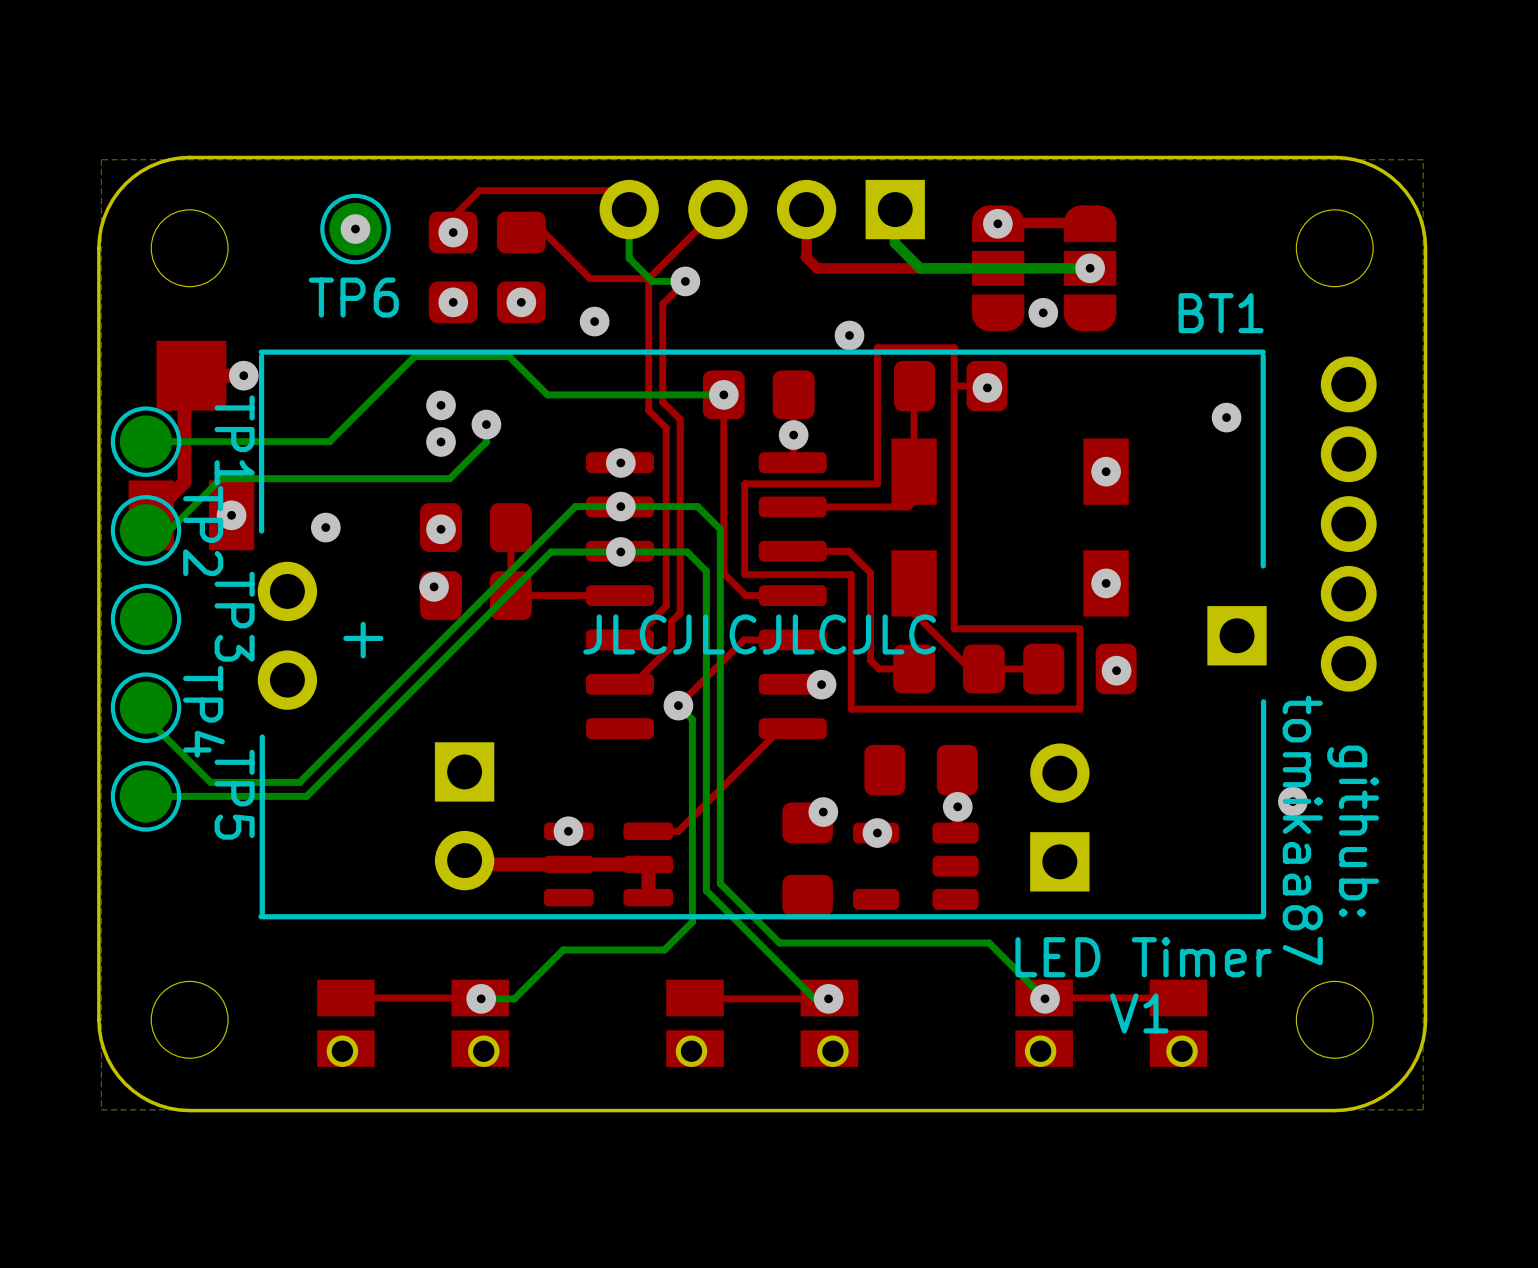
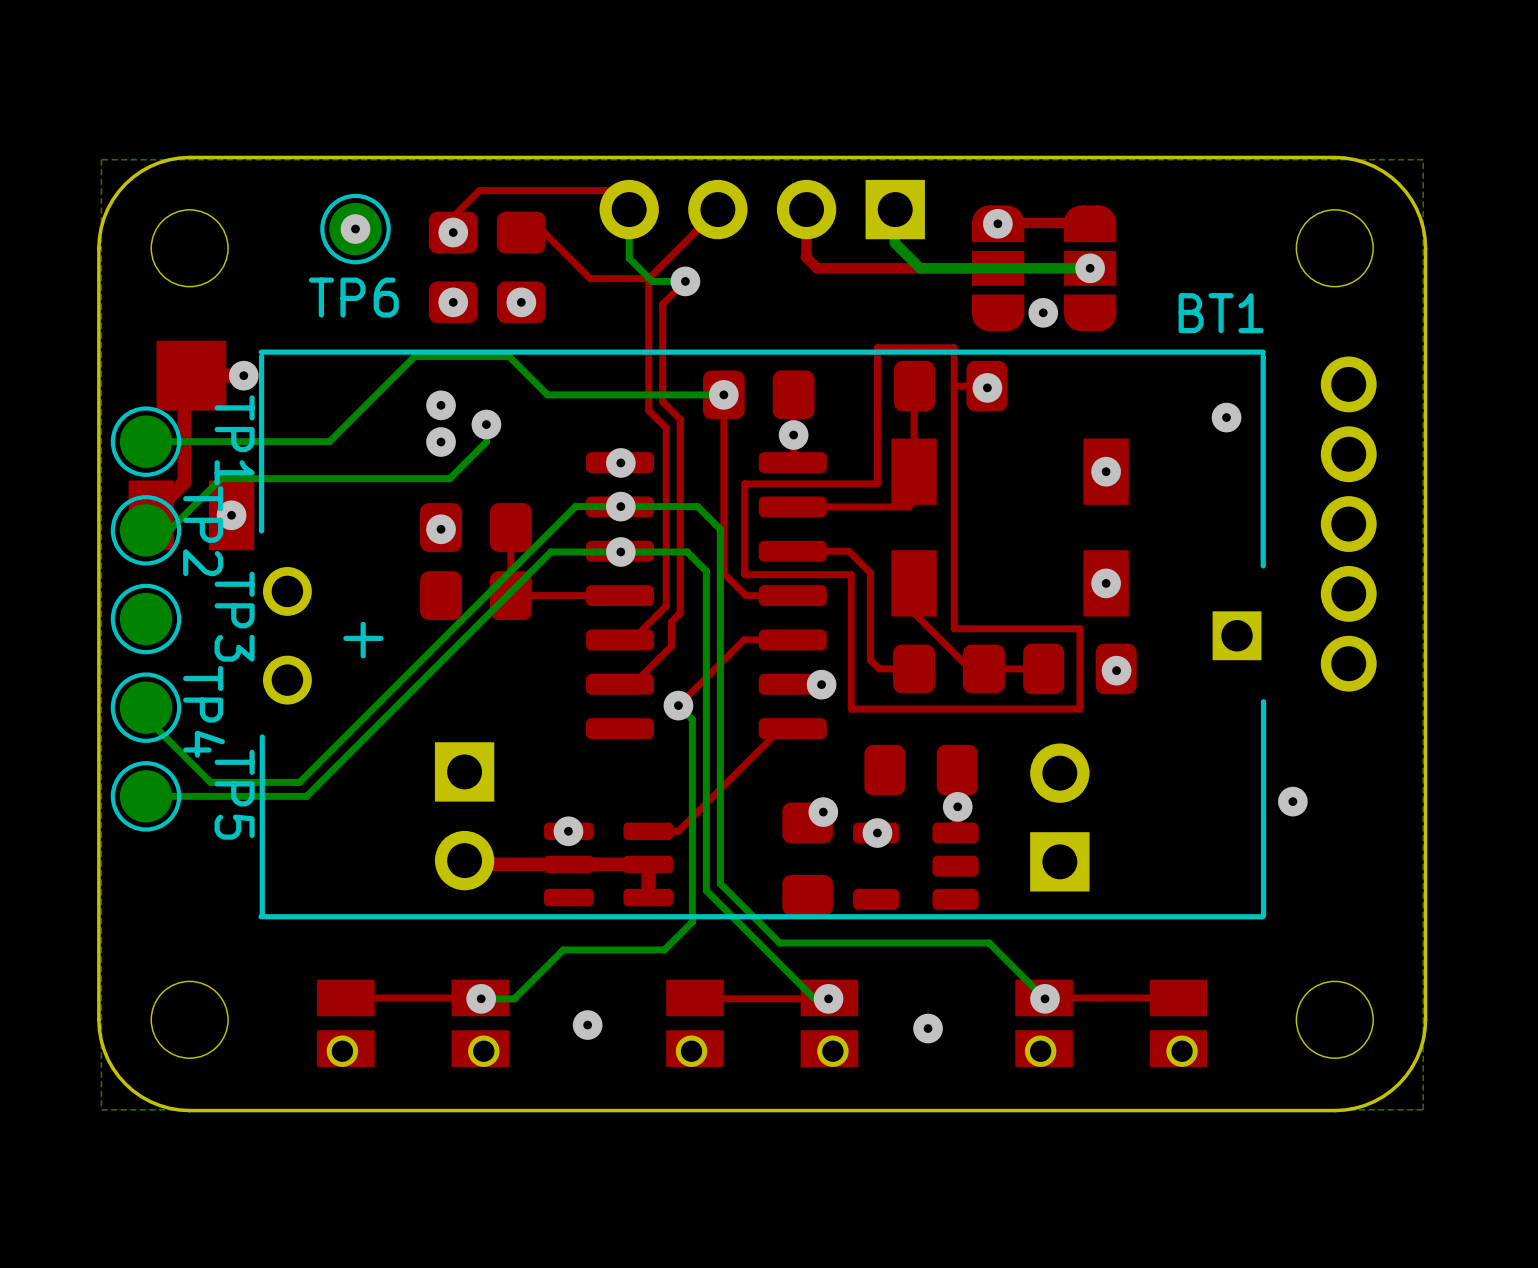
via: (594, 321) -> none
via: (849, 335) -> none
BT1 footprint: [257, 349, 1267, 920] -> [258, 349, 1267, 920]
via: (325, 527) -> none
via: (434, 586) -> none
text: JLCJLCJLCJLC (759, 634) -> none
text: tomikaa87 (1302, 830) -> none
text: github: (1353, 831) -> none
text: LED Timer (1143, 957) -> none
text: V1 (1139, 1013) -> none
via: none -> (587, 1025)
via: none -> (928, 1028)

